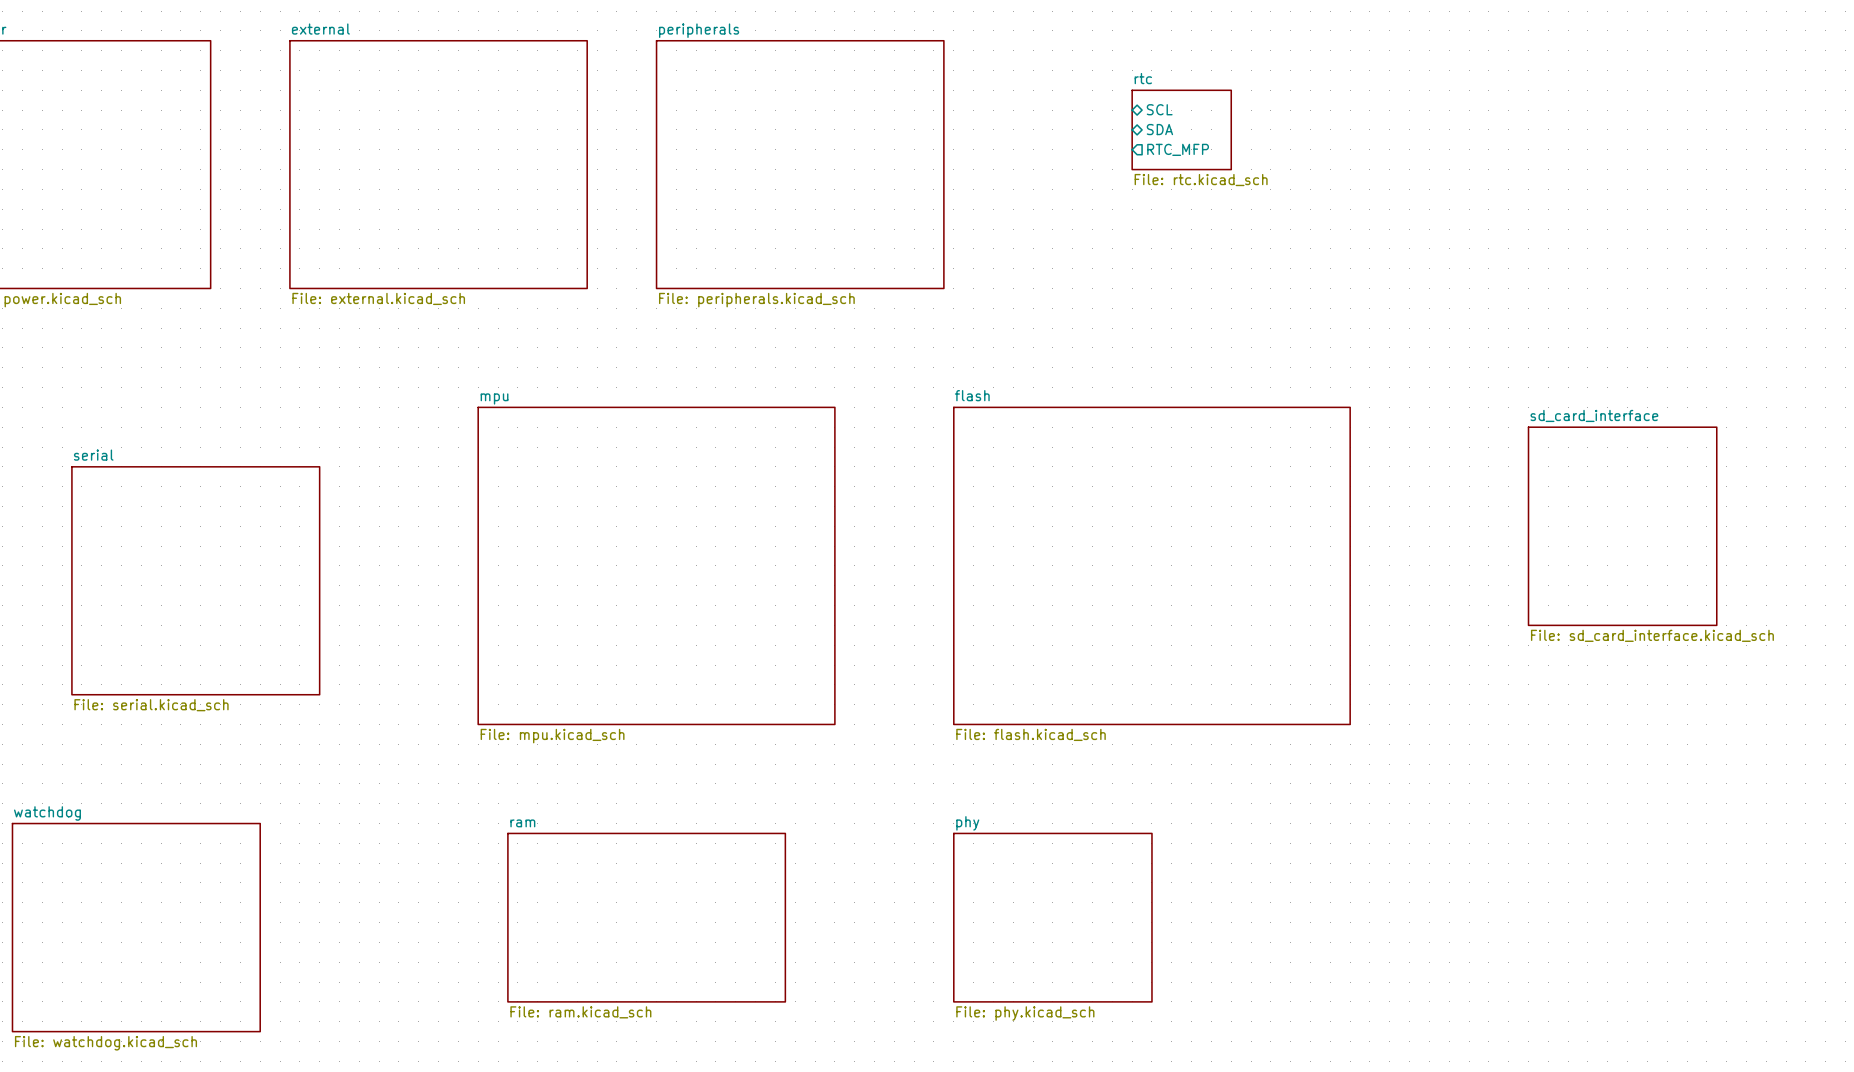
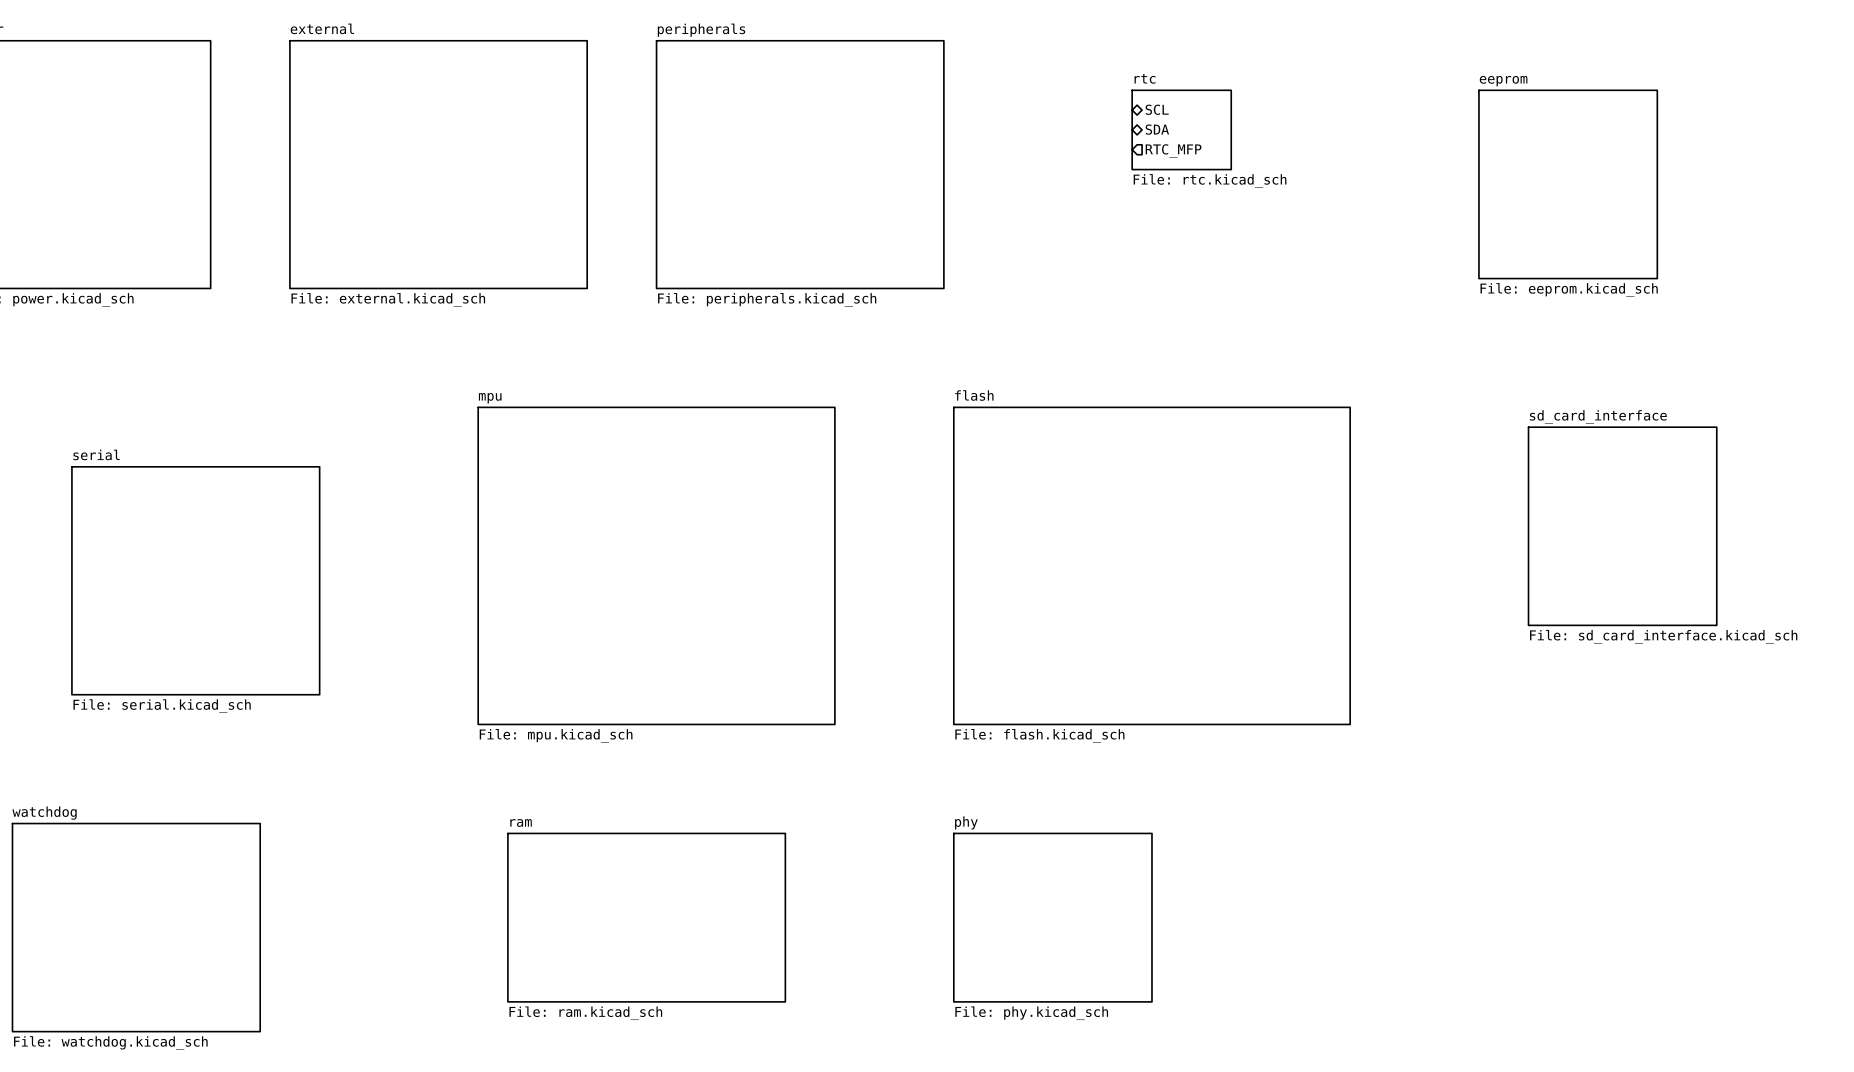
sheet eeprom: none -> File: eeprom.kicad_sch (1568, 184)

